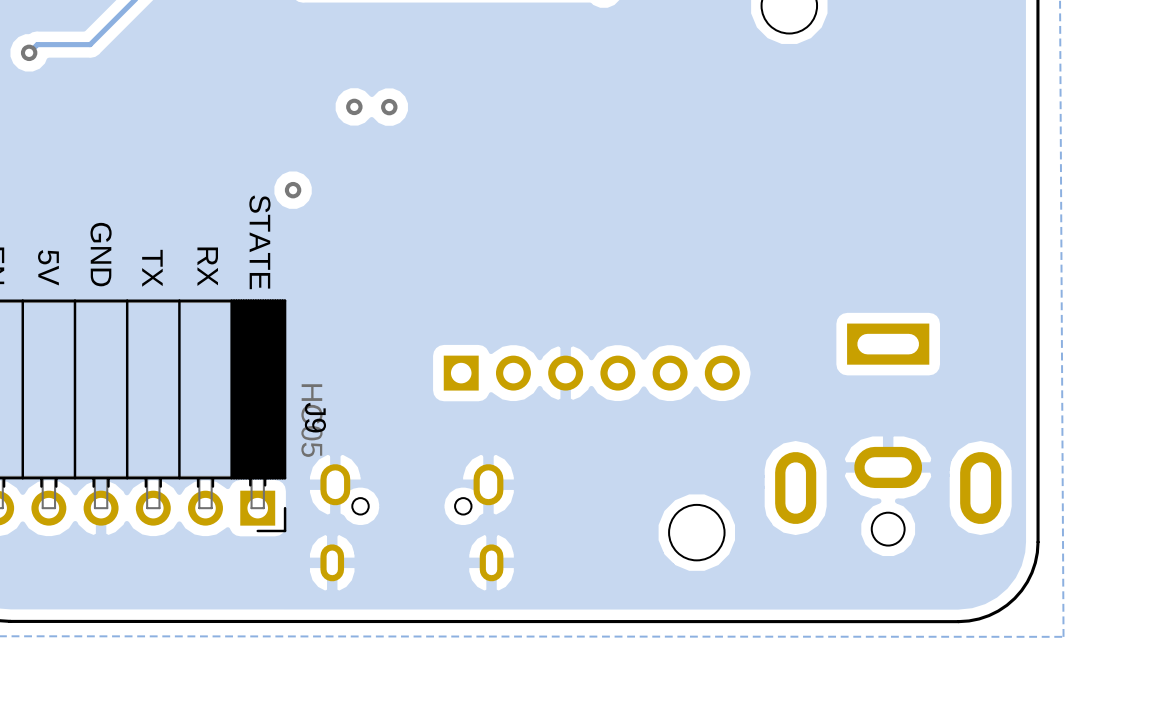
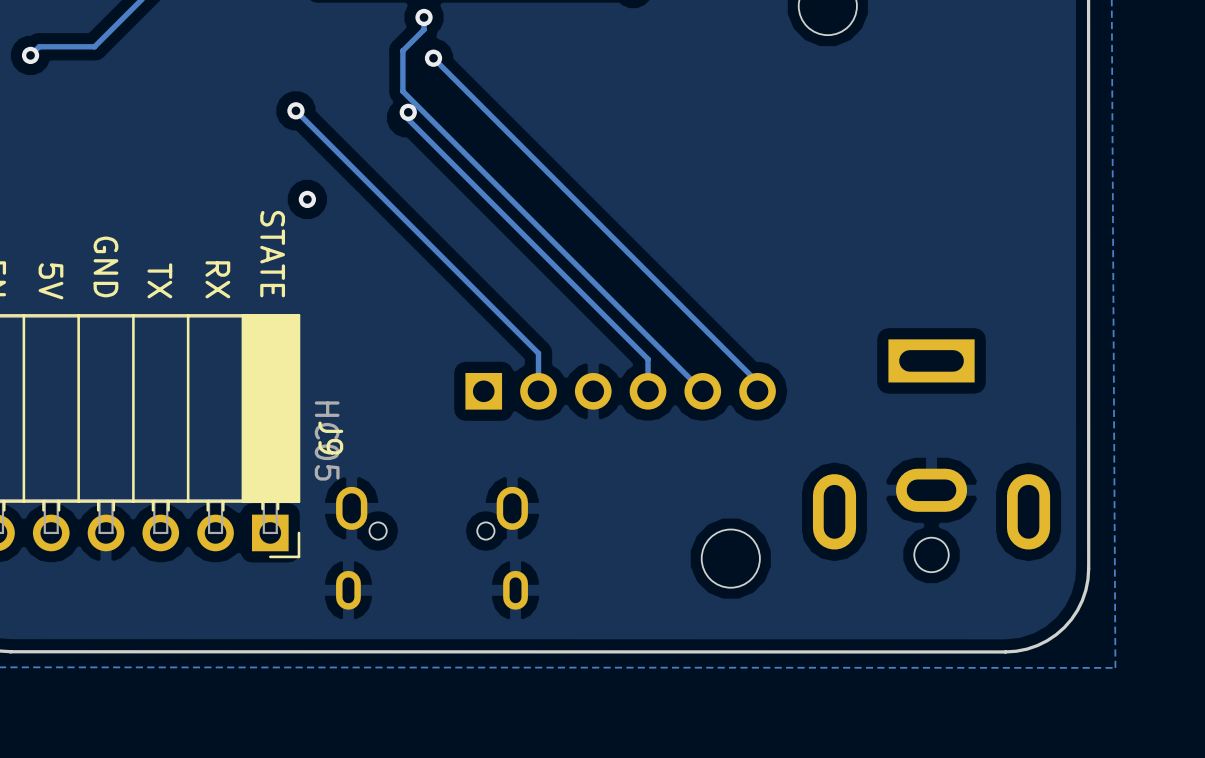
track: none -> (424, 17) (424, 29) (402, 50) (402, 91) (702, 391)
via: none -> (424, 17)
track: none -> (433, 58) (757, 382) (757, 391)
via: none -> (433, 58)
track: none -> (295, 110) (538, 353) (538, 391)
via: none -> (295, 110)
via: (354, 106) -> none
track: none -> (406, 117) (648, 359) (648, 391)

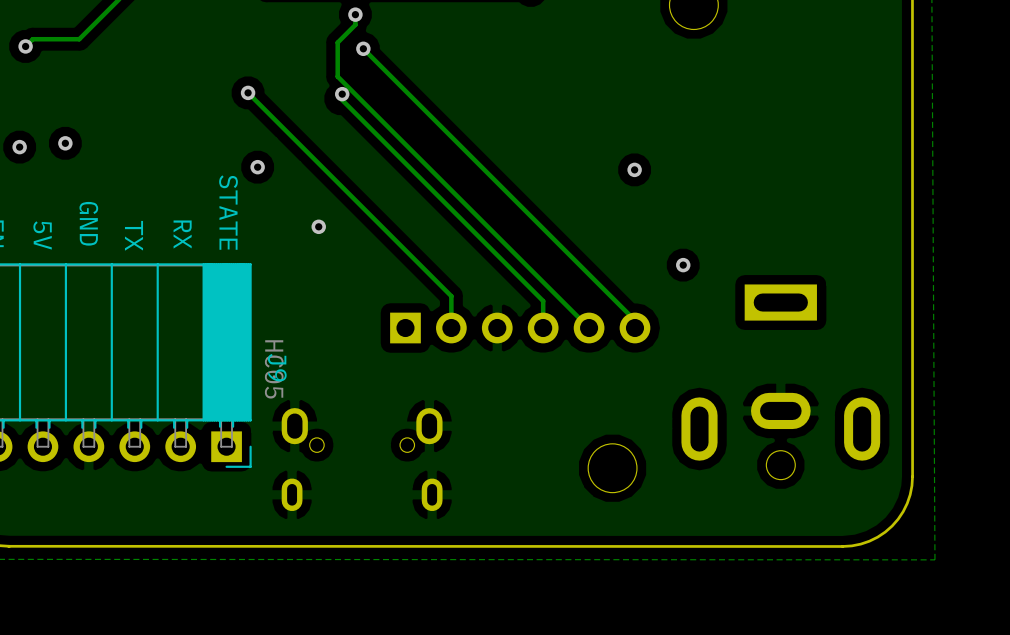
via: none -> (65, 143)
via: none -> (19, 147)
via: none -> (634, 169)
via: none -> (318, 226)
via: none -> (683, 265)

